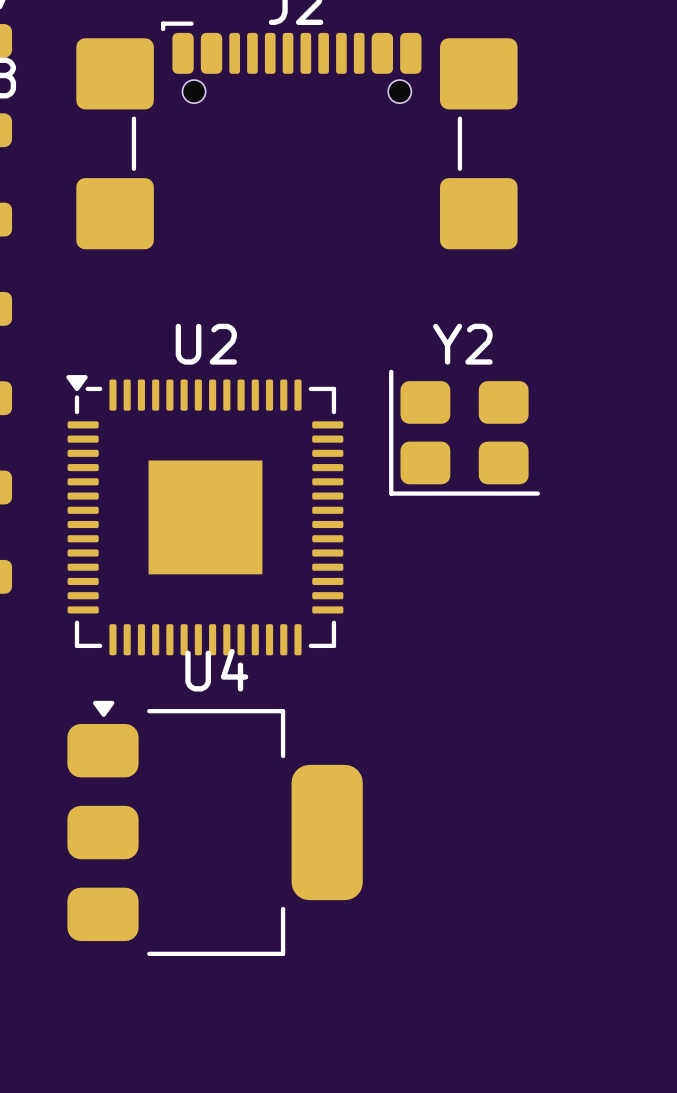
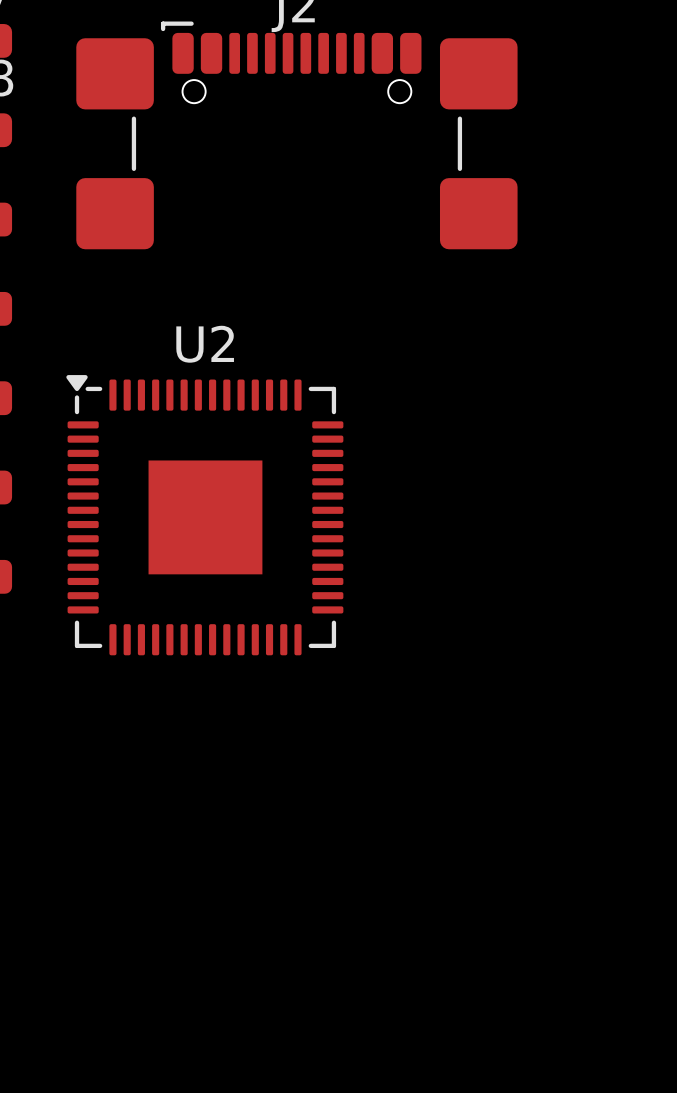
Y2: (464, 432) -> none
U4: (215, 828) -> none

